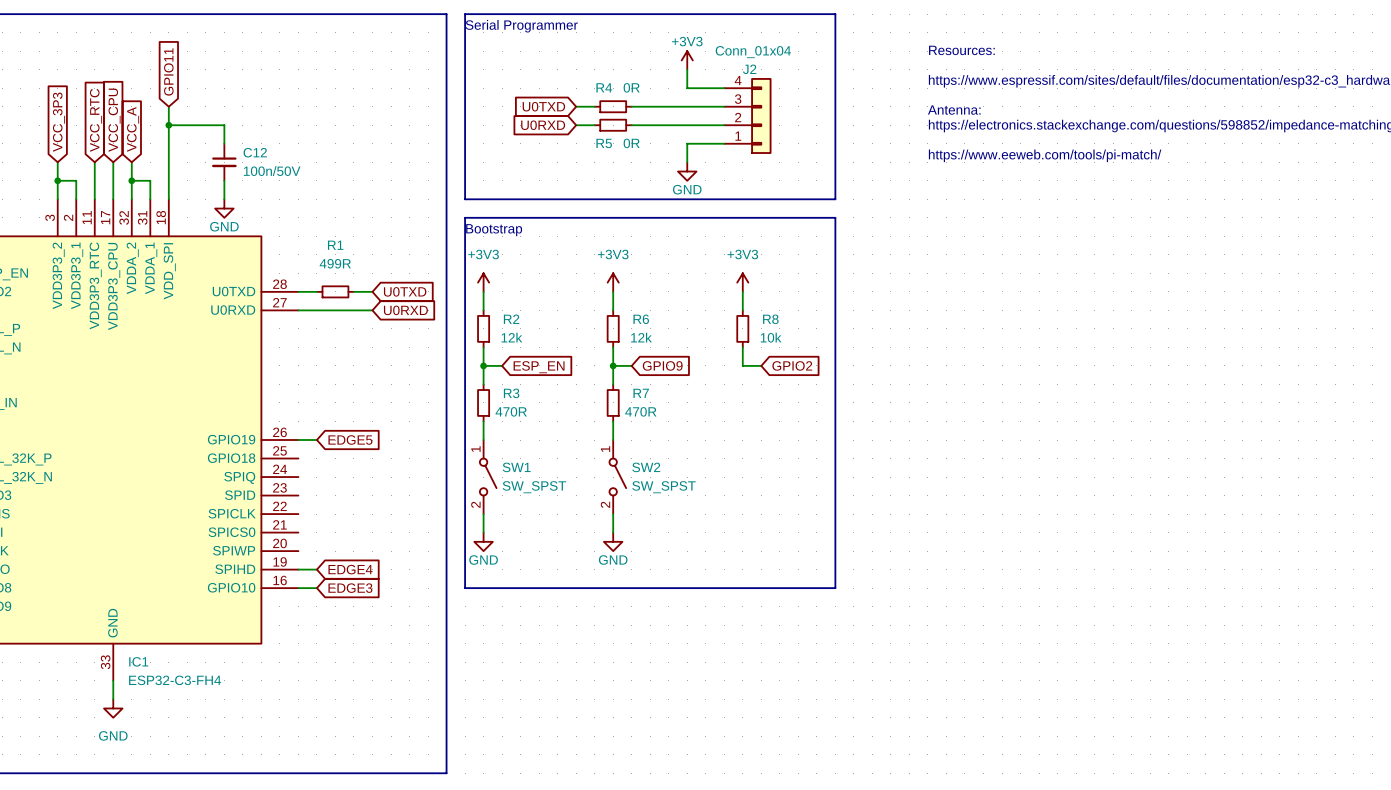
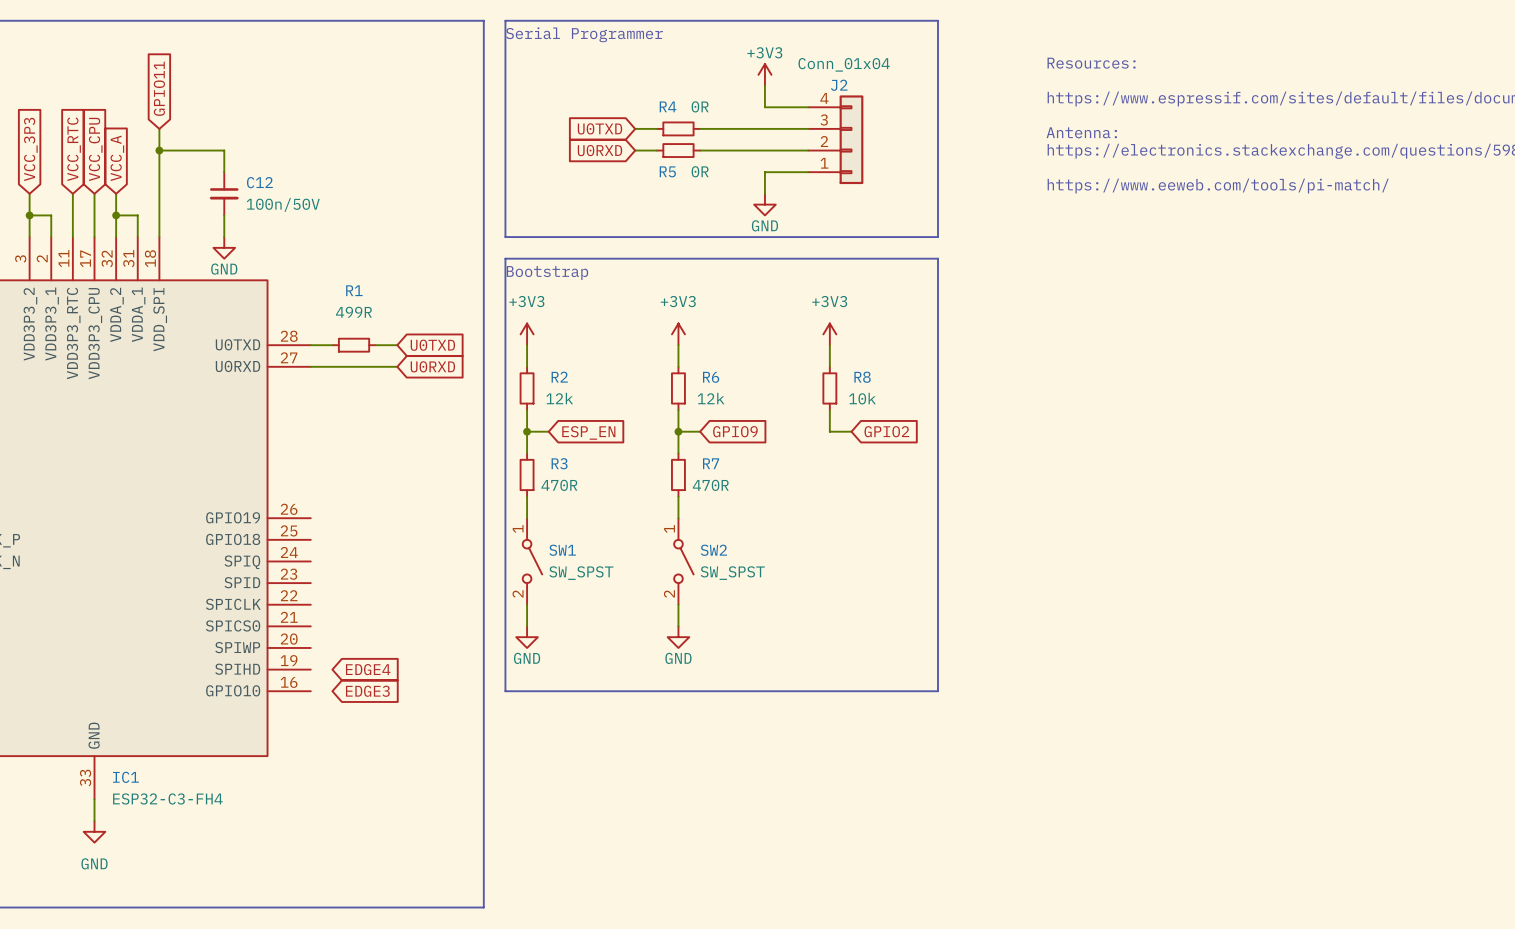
global label: EDGE5 (350, 439) -> none
wire: (298, 440) (316, 440) -> none
wire: (298, 569) (316, 569) -> none
wire: (298, 588) (316, 588) -> none

